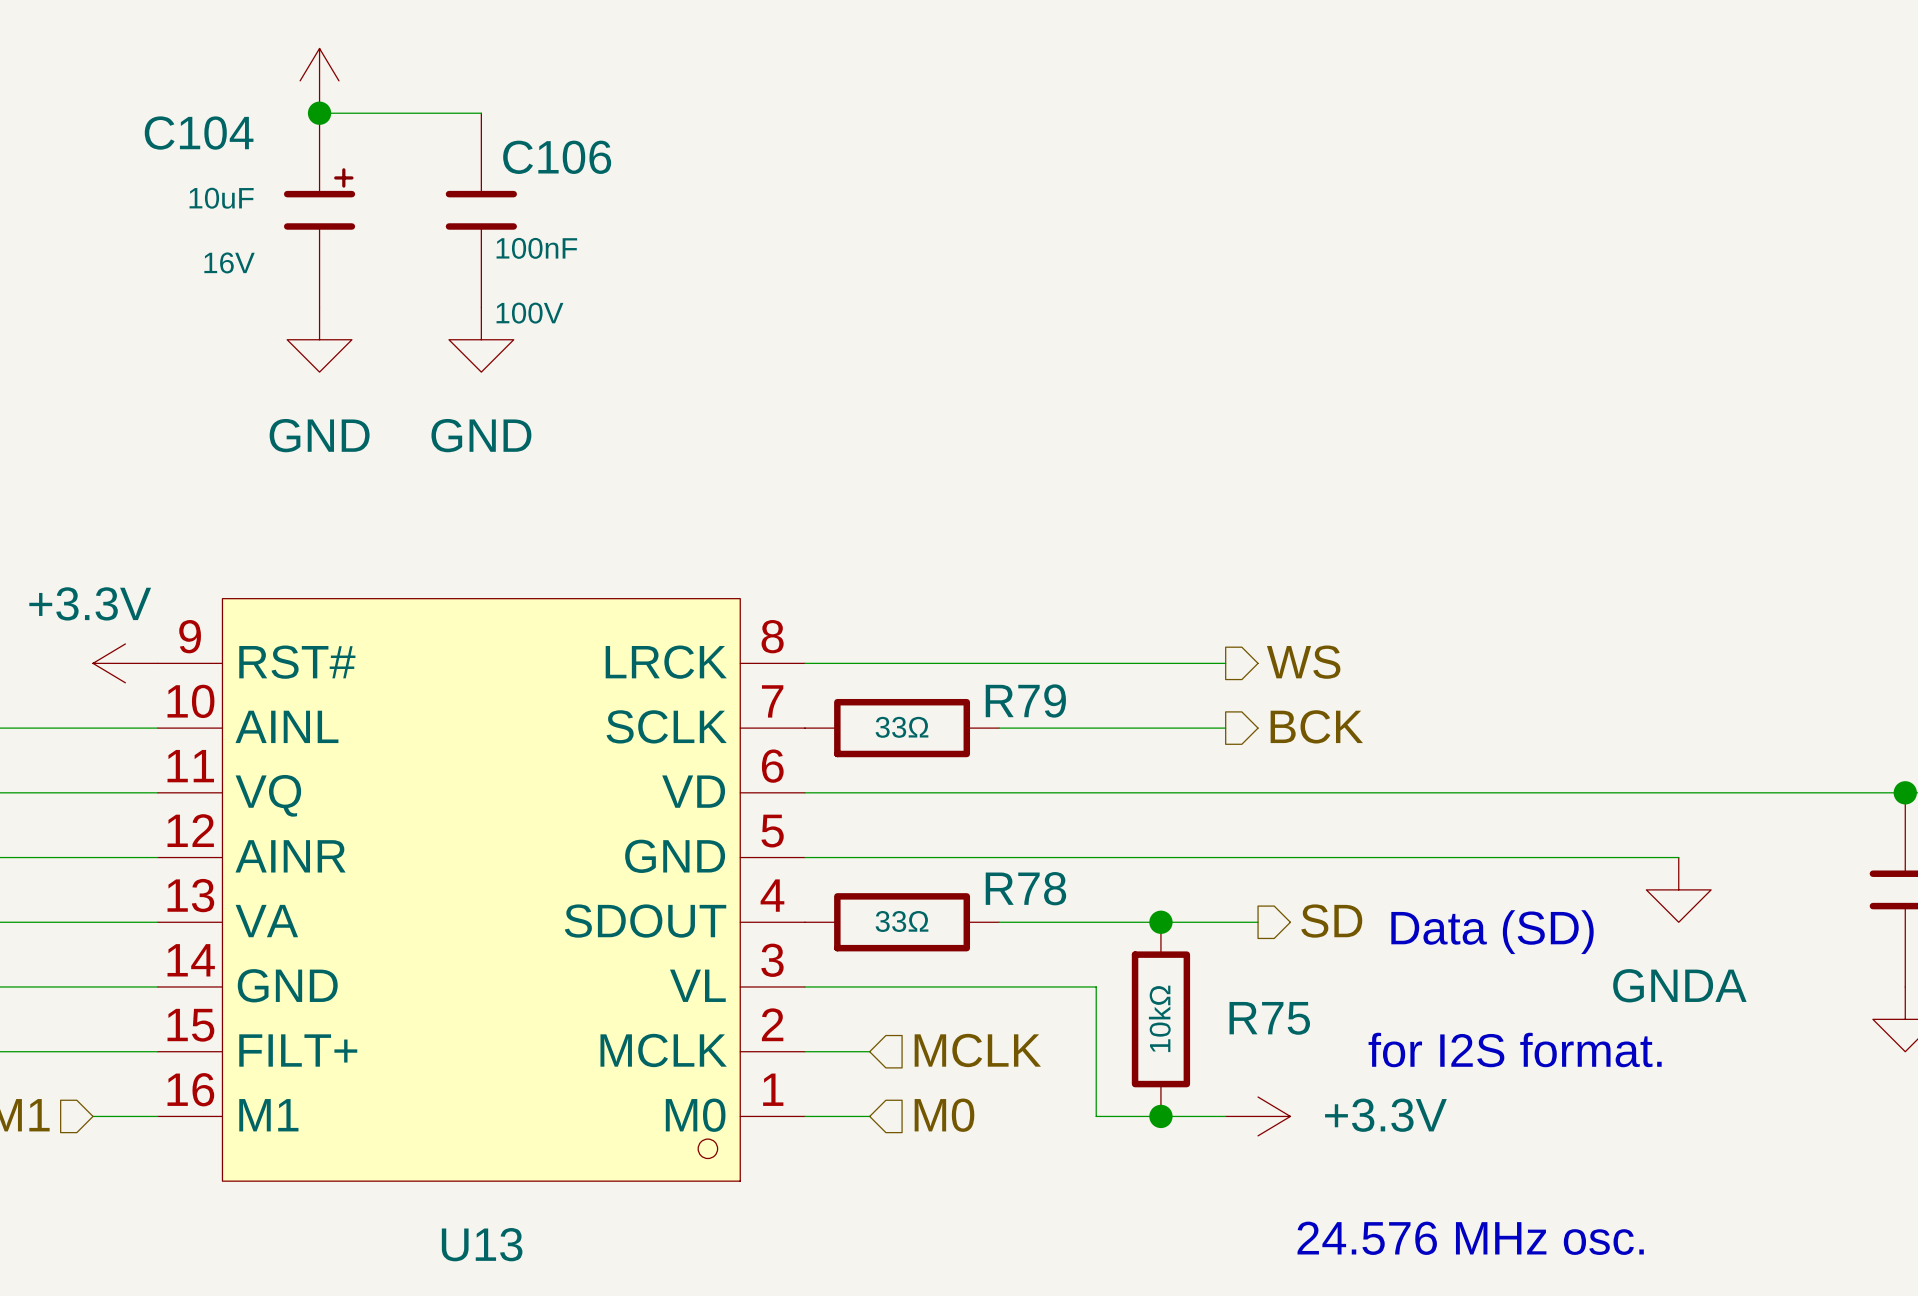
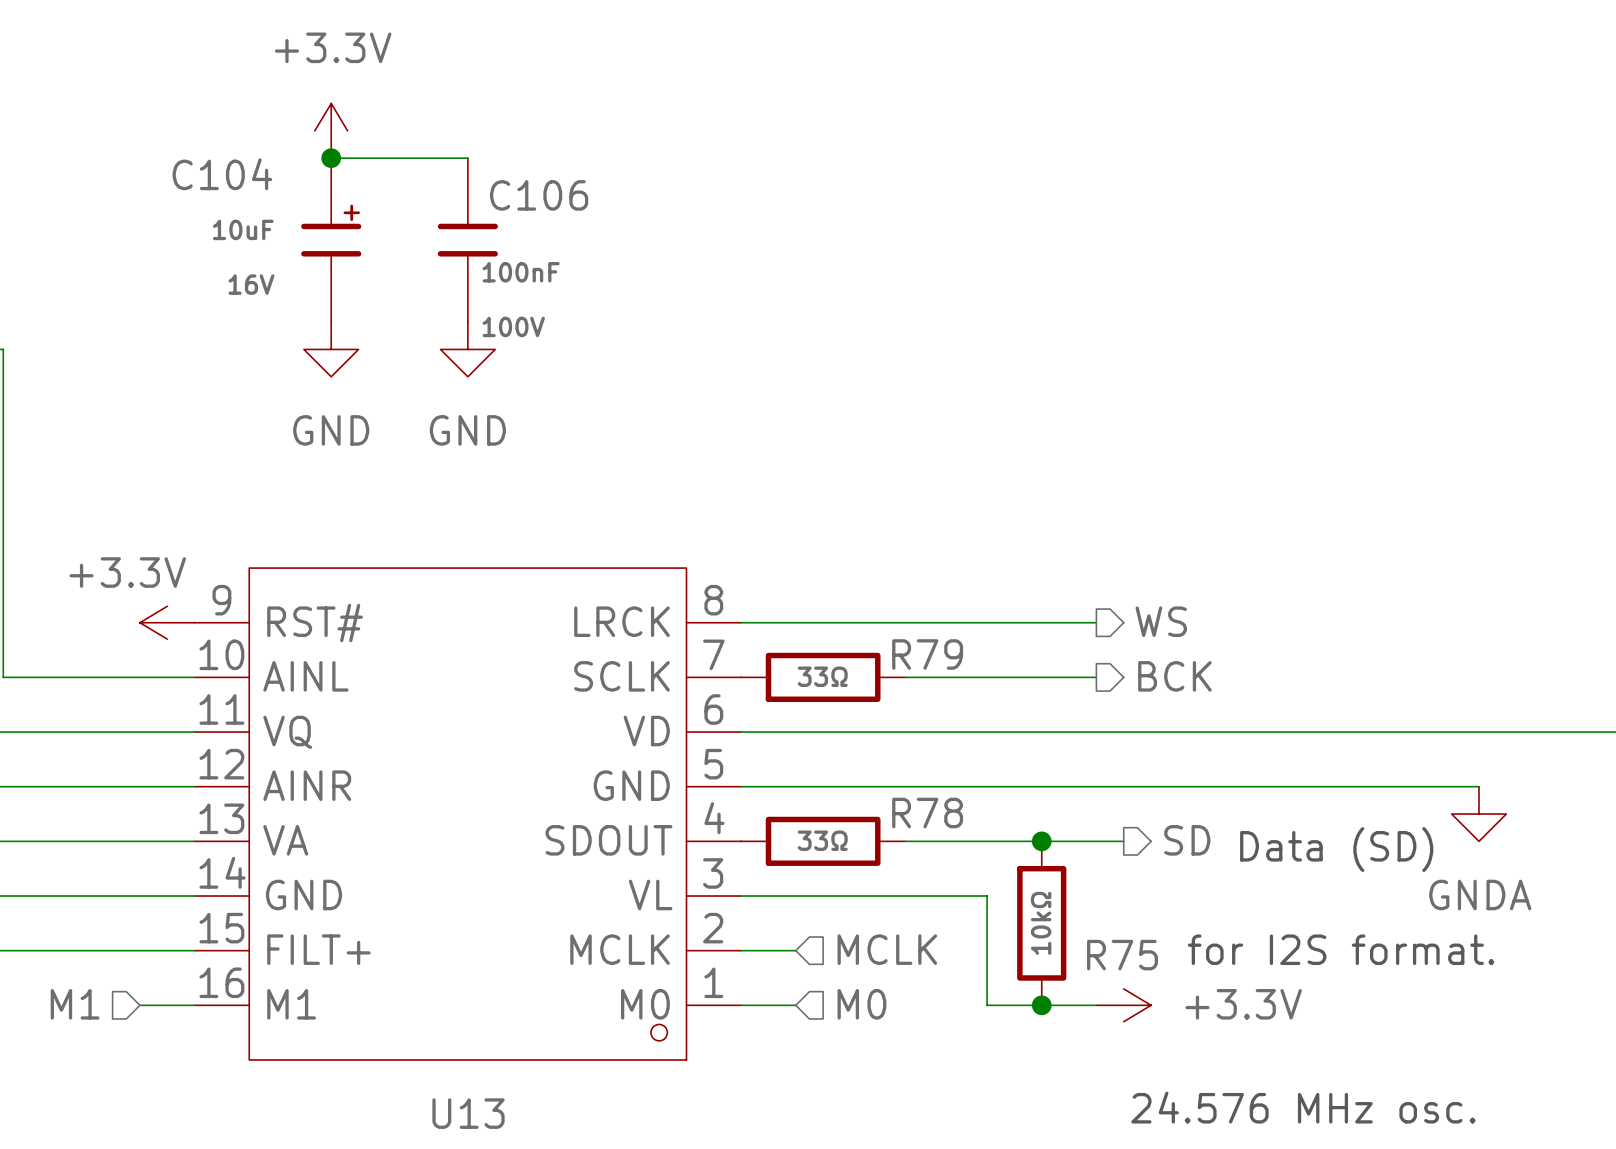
R75 name position: R75 (1269, 1018) -> R75 (1122, 955)

